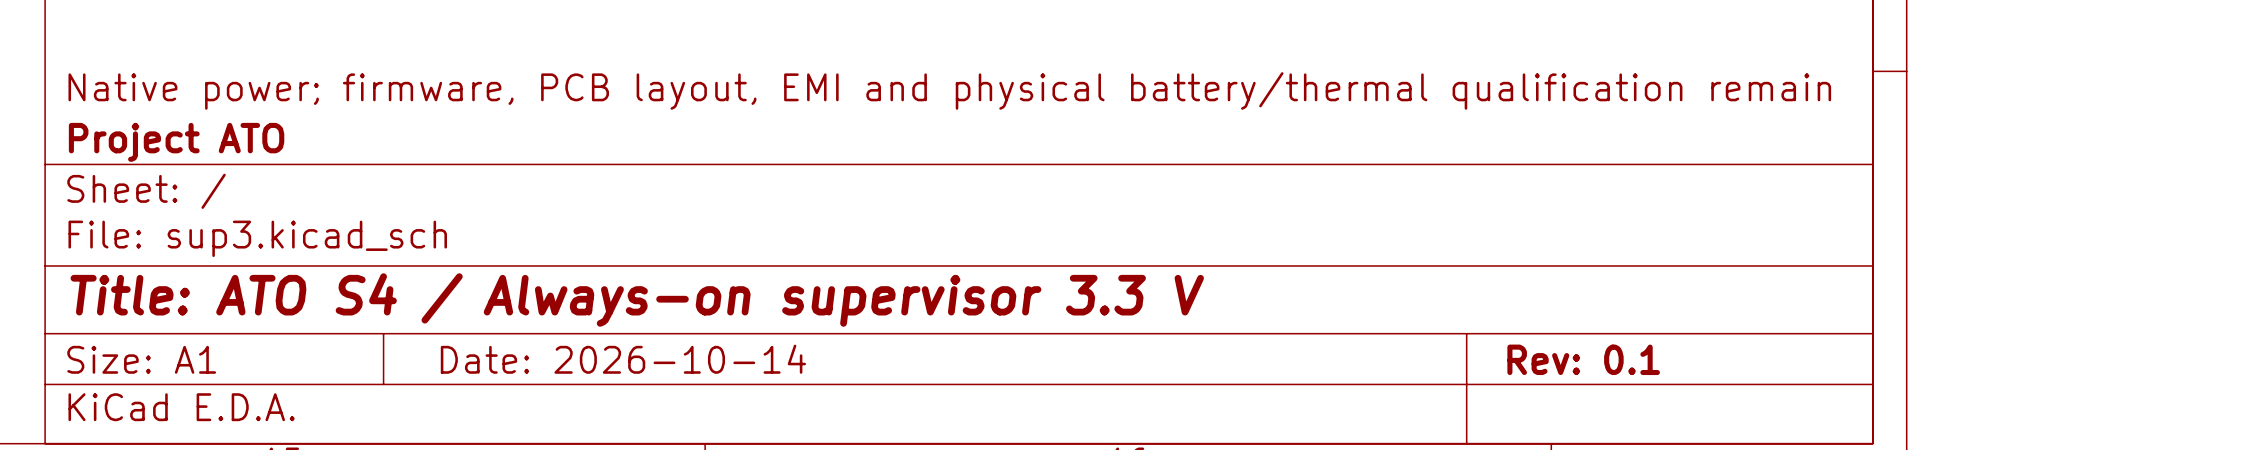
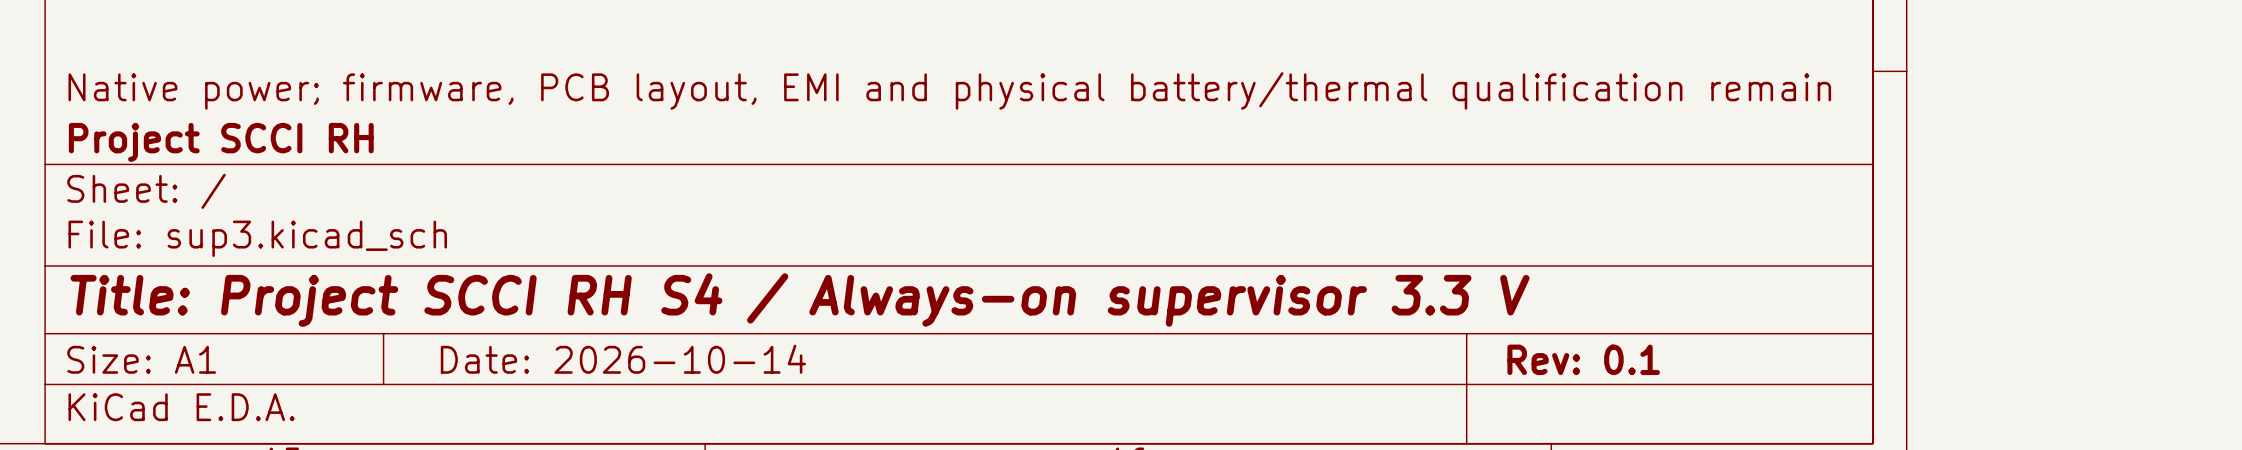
title block: Project ATO (176, 142) -> Project SCCI RH (221, 142)
title block: Title: ATO S4 / Always-on supervisor 3.3 V (637, 300) -> Title: Project SCCI RH S4 / Always-on supervisor 3.3 V (800, 300)

